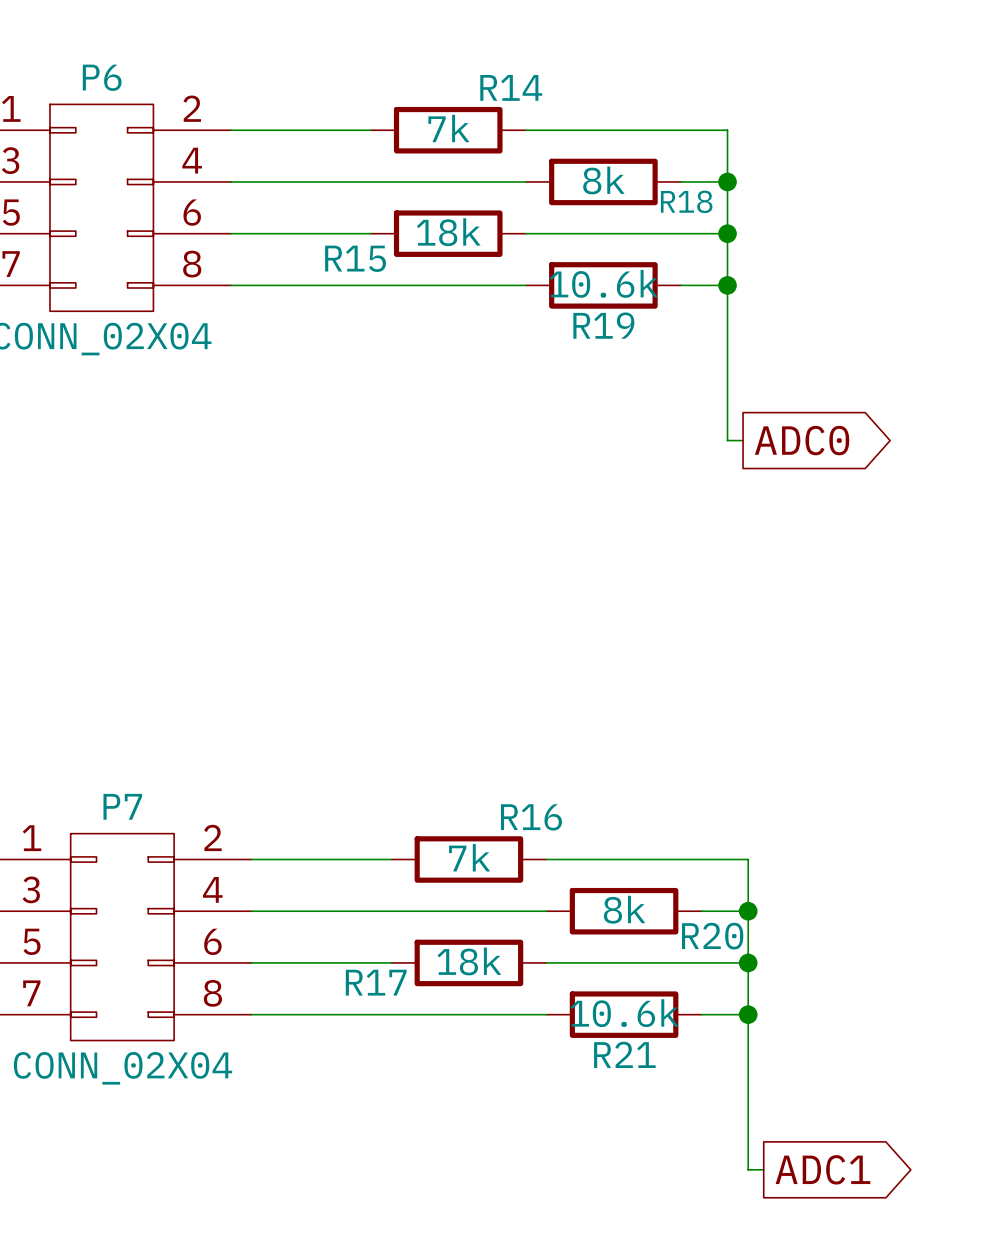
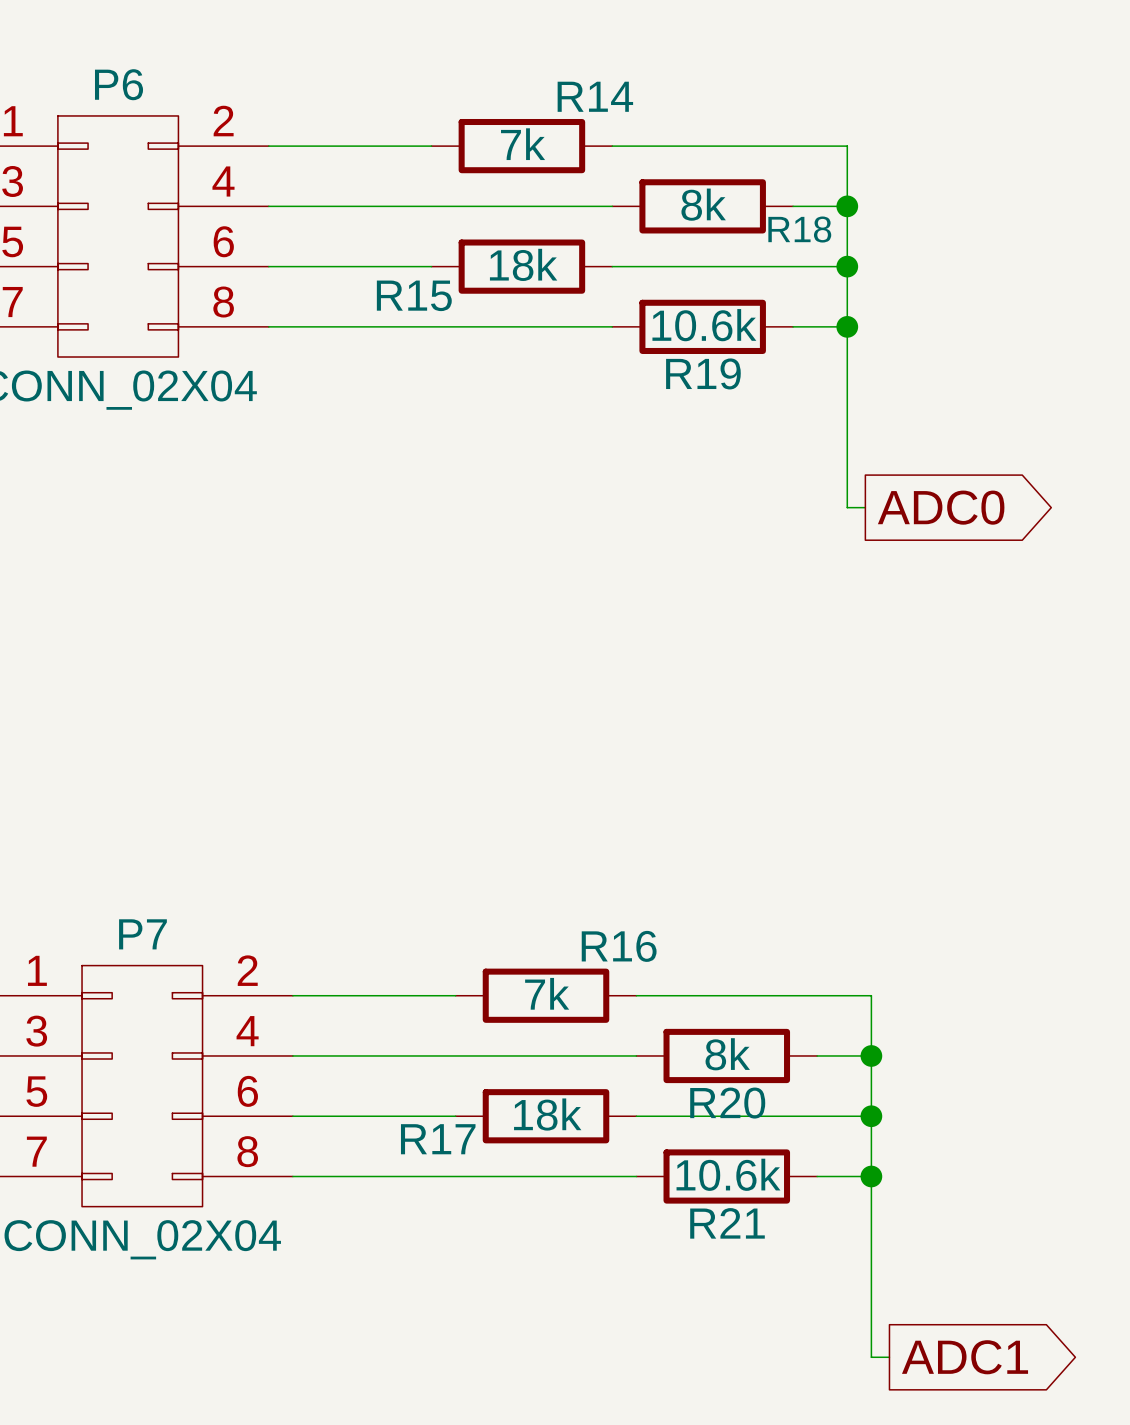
R20 name position: R20 (712, 936) -> R20 (727, 1103)

